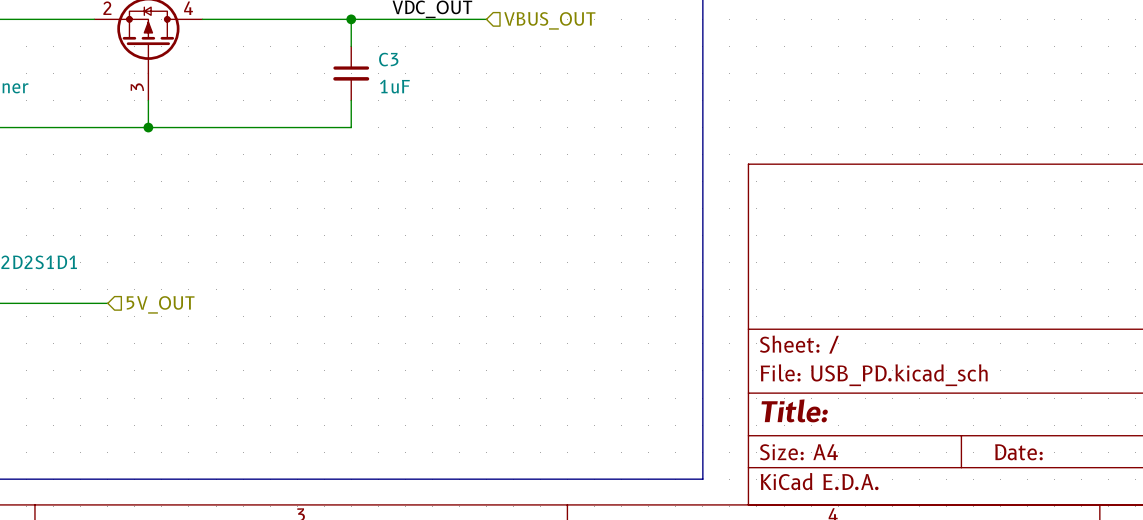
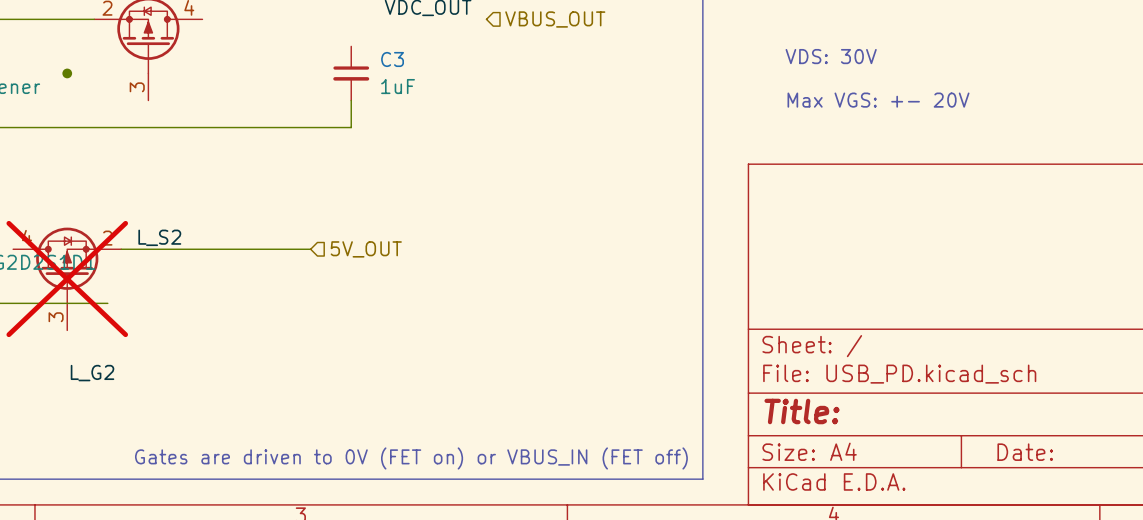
wire: (202, 19) (486, 19) -> none
wire: (351, 19) (351, 46) -> none
junction: (351, 19) -> none
text: none -> VDS: 30V (831, 56)
junction: none -> (67, 73)
wire: (148, 100) (148, 127) -> none
text: none -> Max VGS: +- 20V (878, 100)
junction: (148, 127) -> none
label: none -> L_S2 (159, 237)
wire: none -> (121, 249) (310, 249)
part: none -> (67, 279)
hierarchical label position: 5V_OUT (160, 304) -> 5V_OUT (366, 249)
label: none -> L_G2 (92, 373)
text: none -> Gates are driven to 0V (FET on) or VBUS_IN (FET off) (411, 458)

